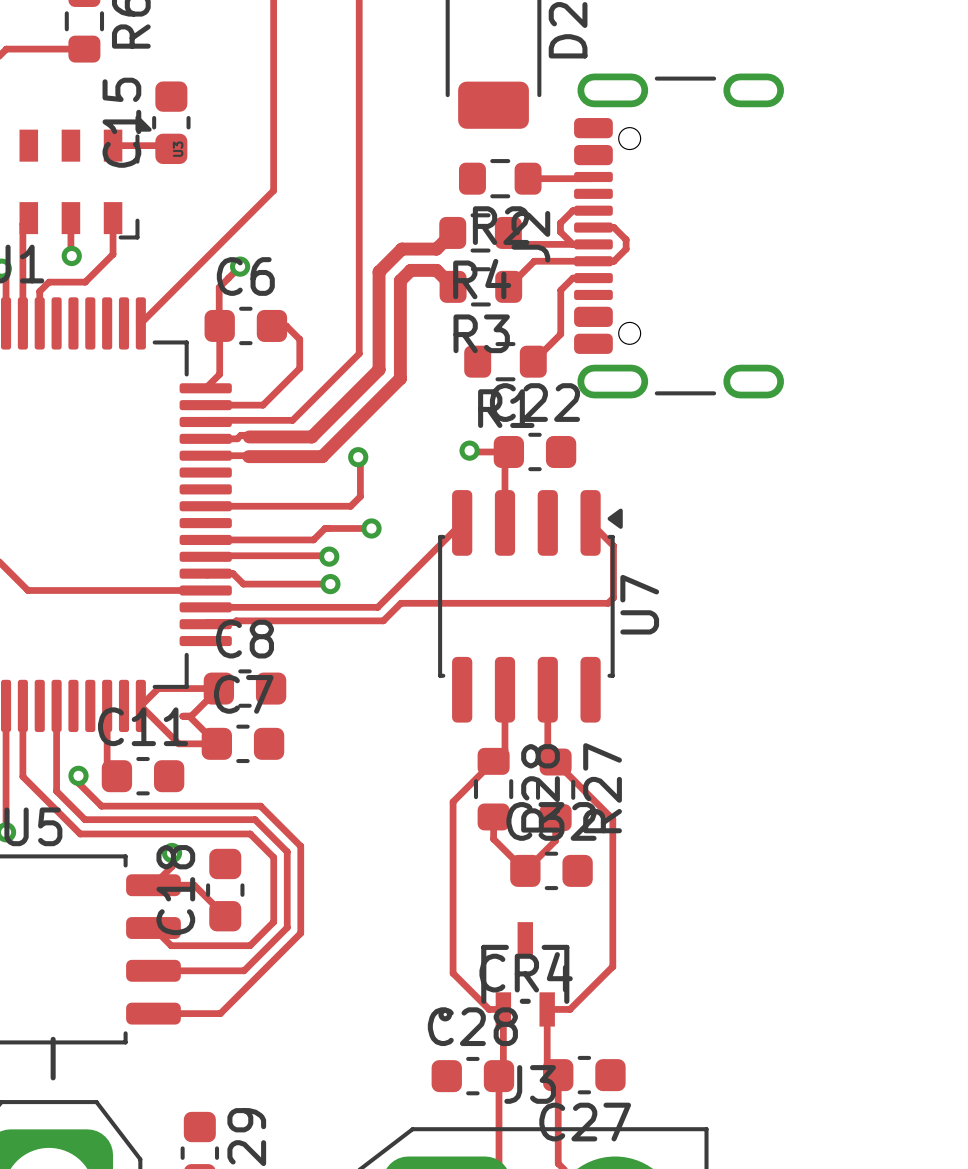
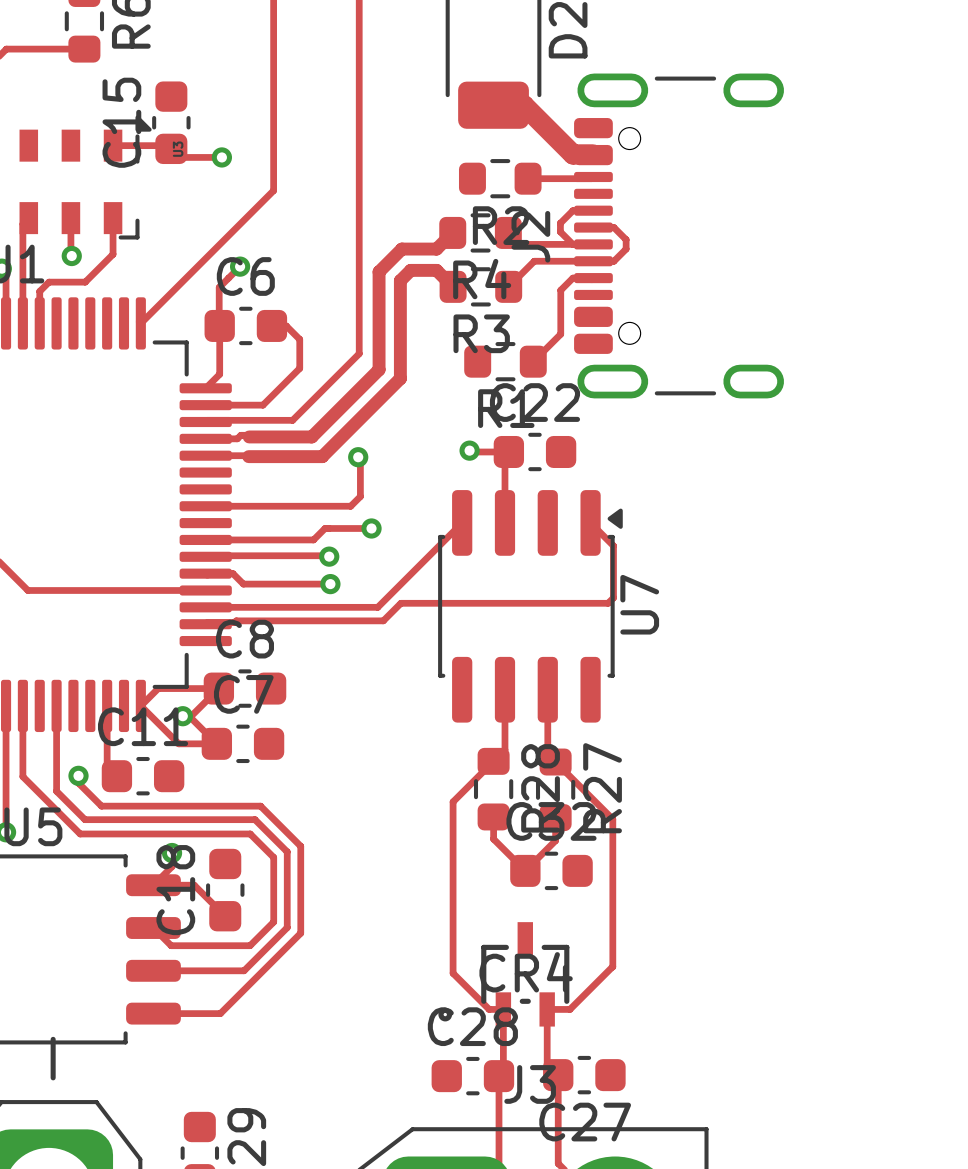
track: none -> (493, 105) (523, 105) (573, 154) (593, 155)
track: none -> (171, 148) (179, 157) (221, 157)
via: none -> (221, 157)
via: none -> (182, 716)

